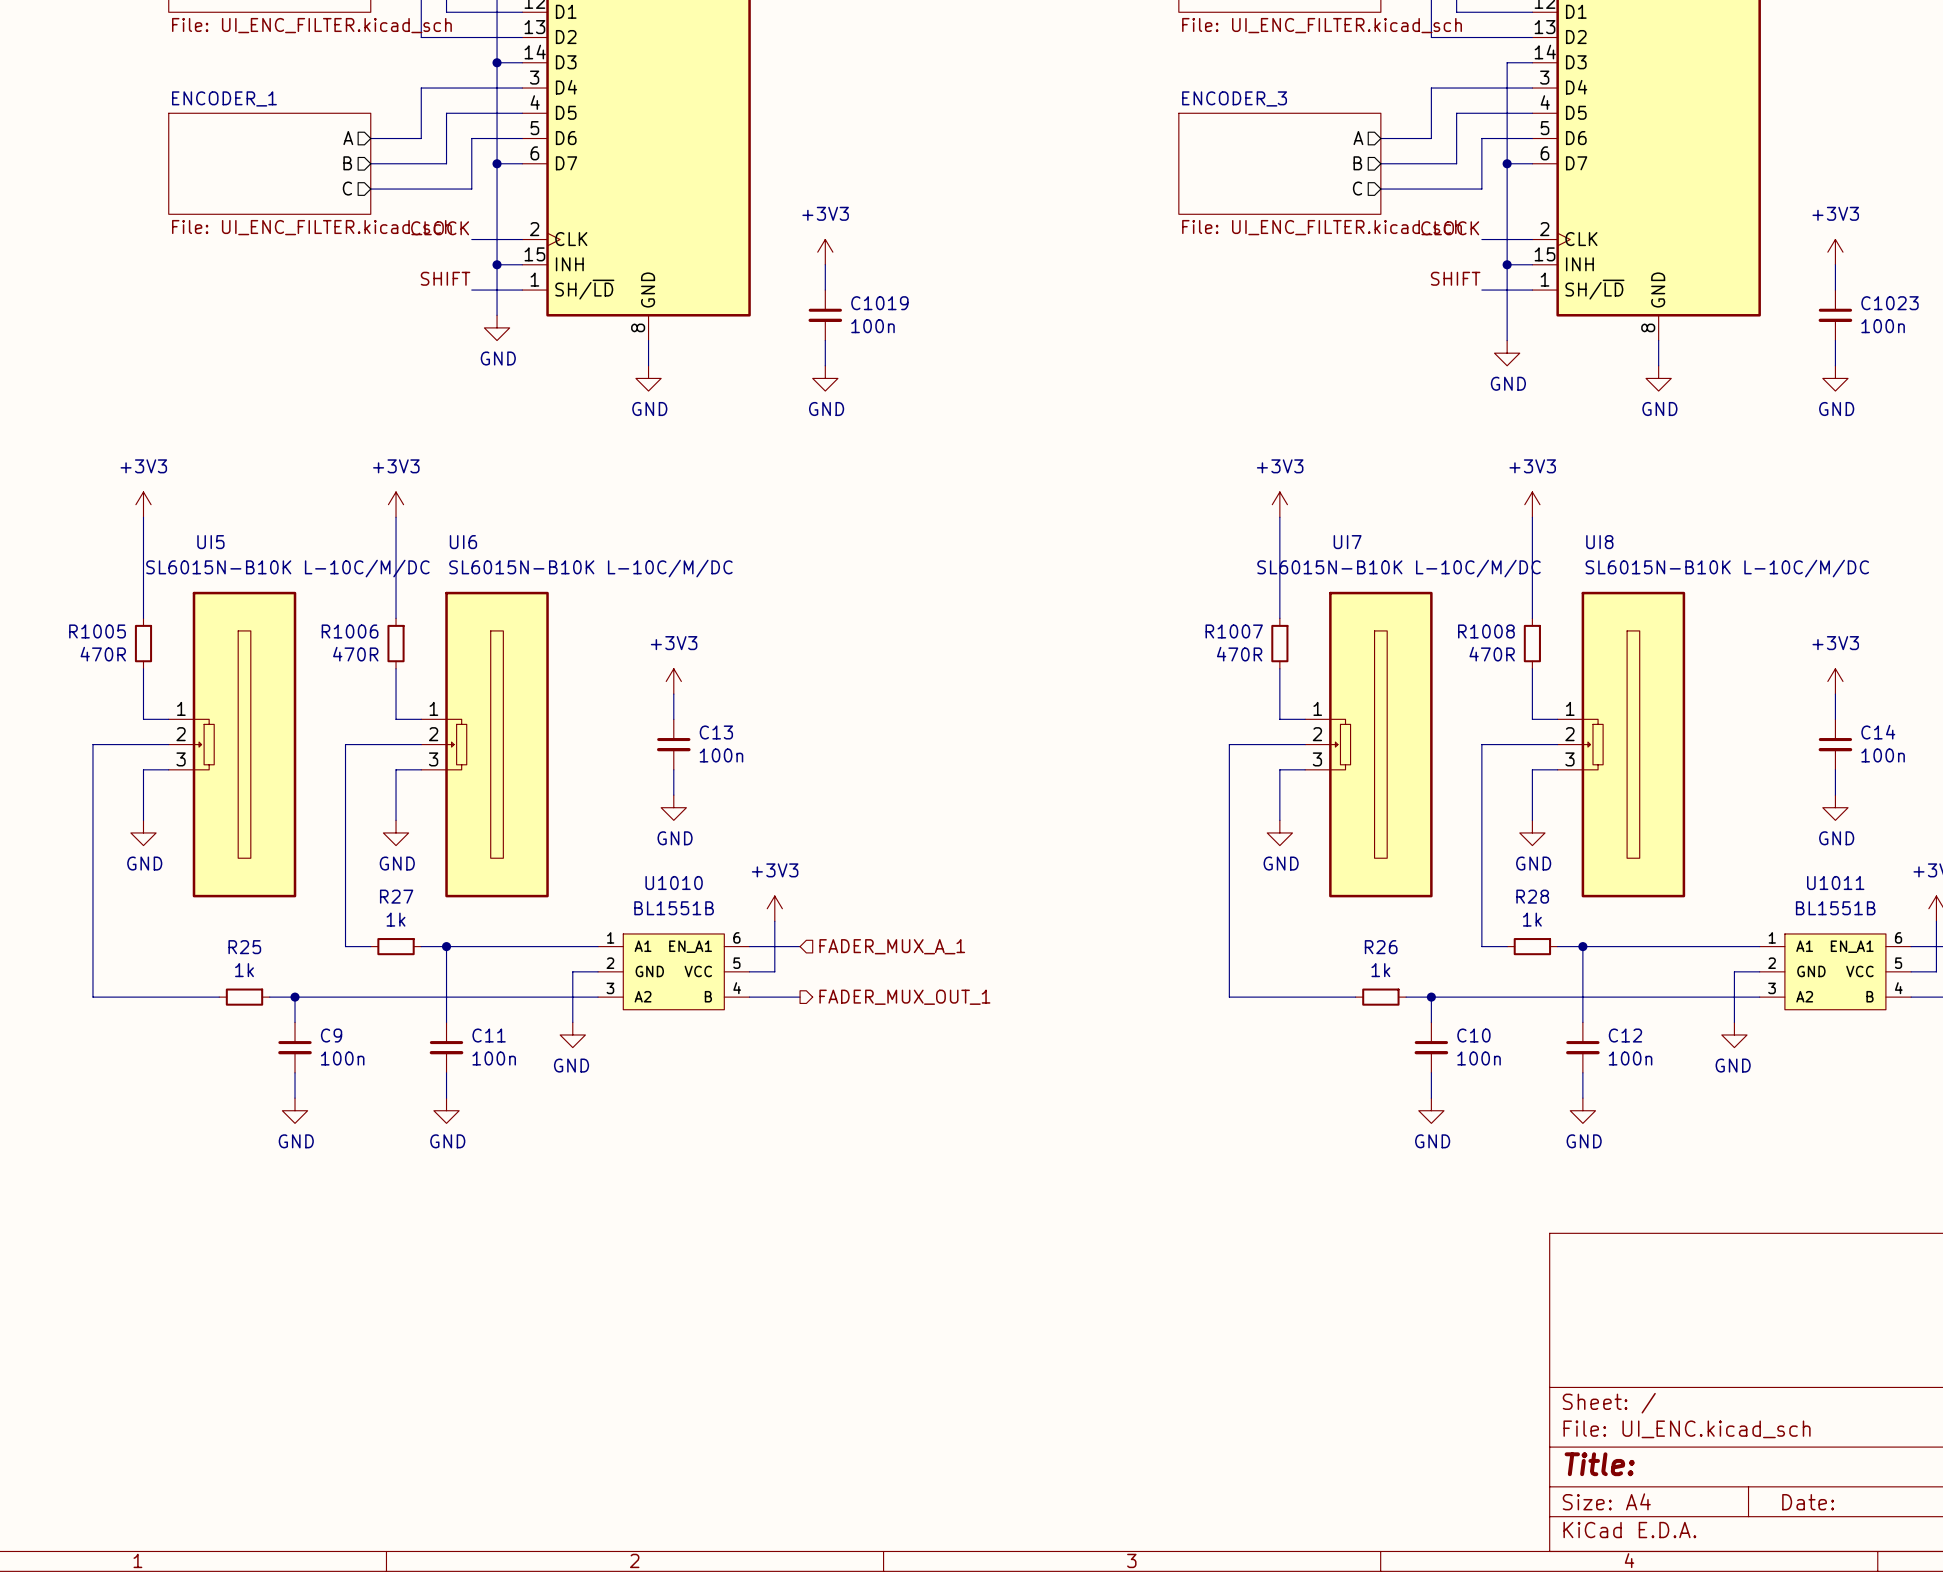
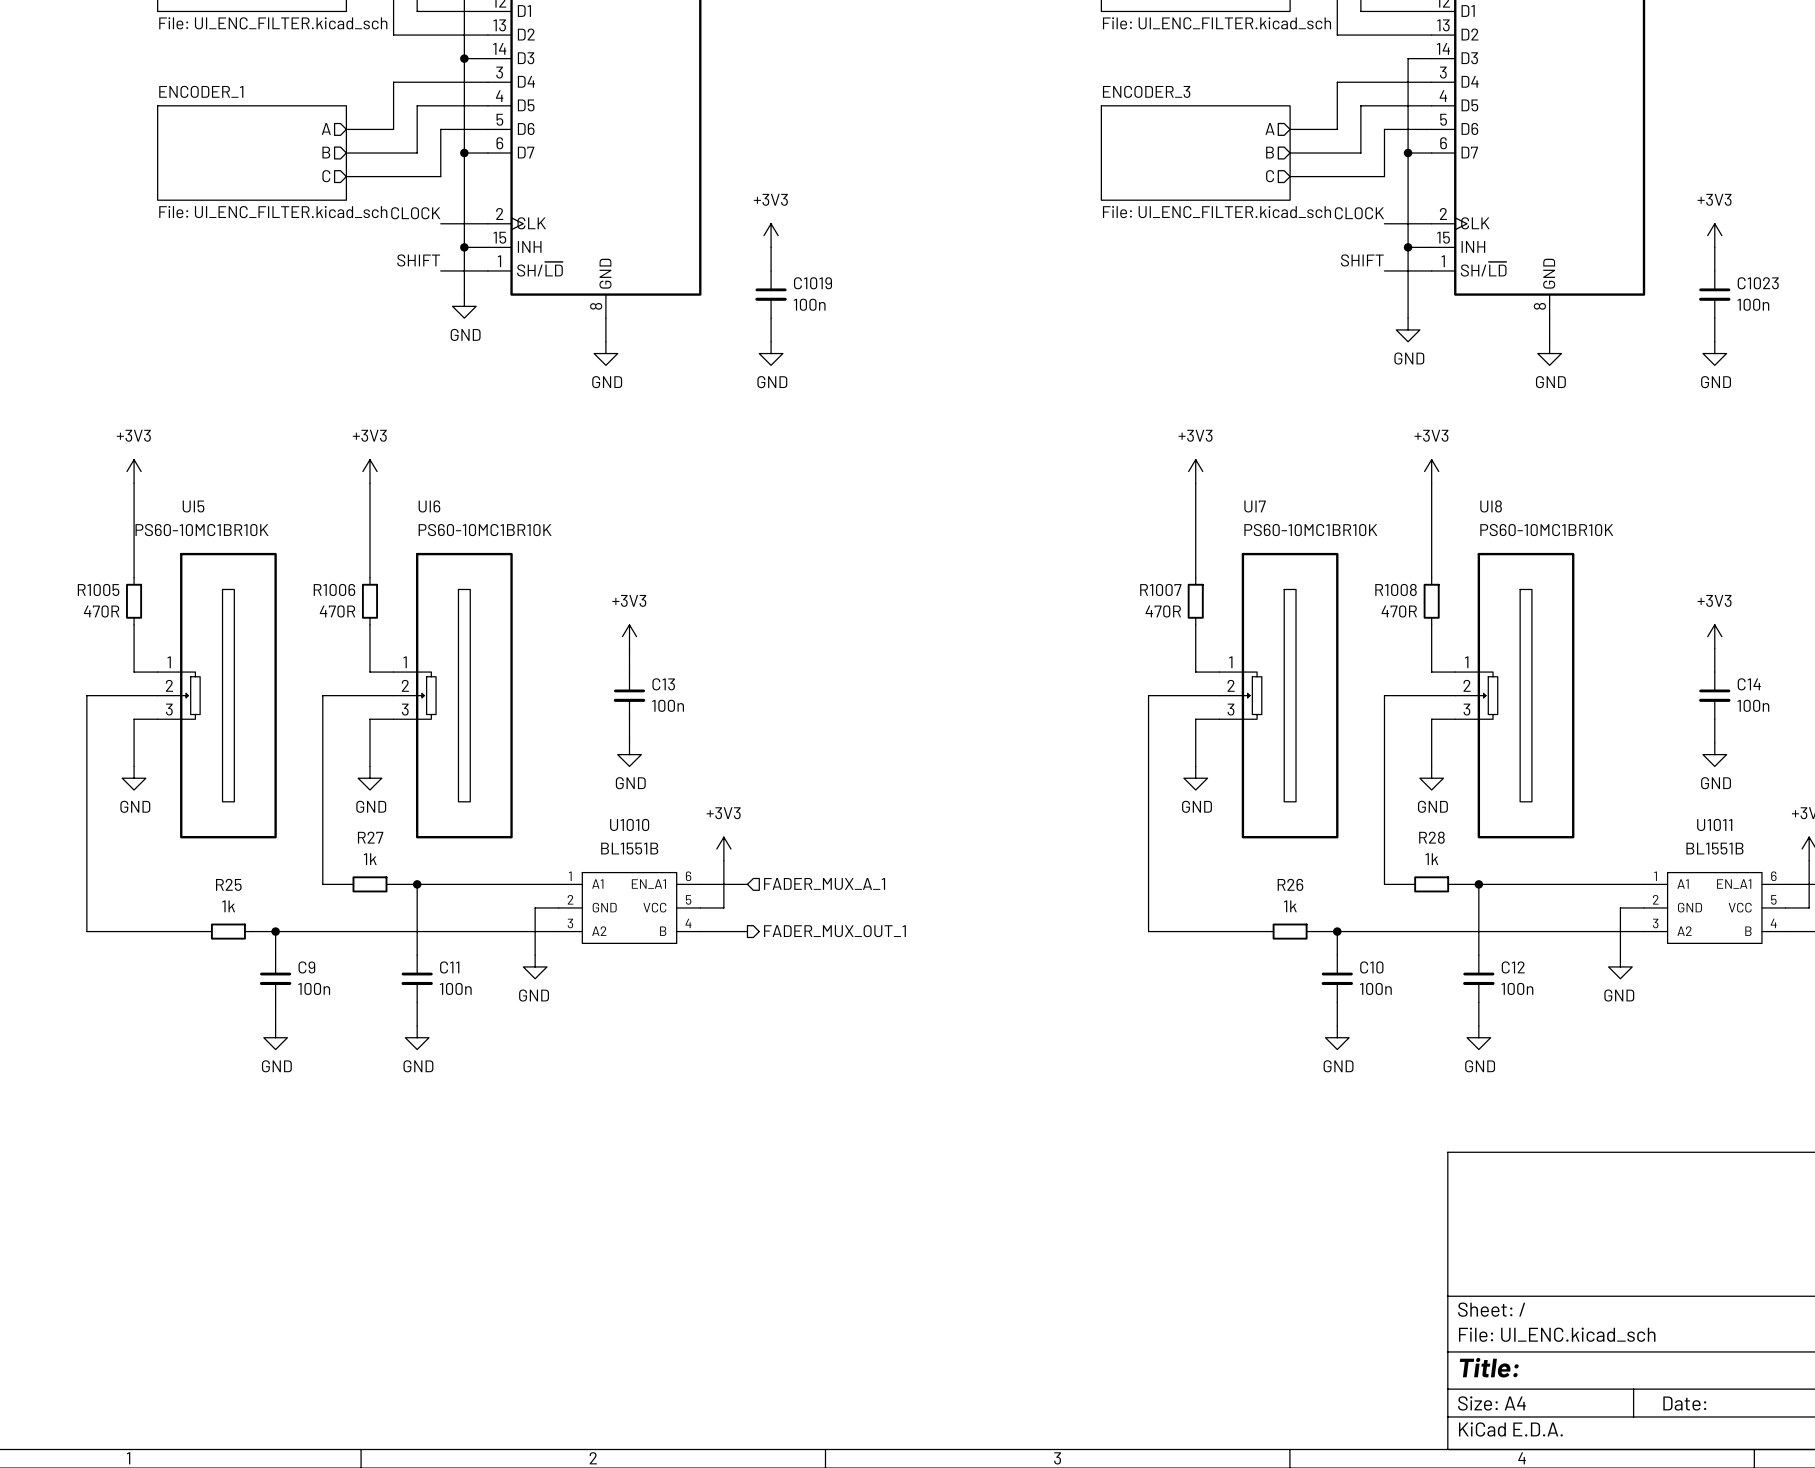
UI5 value: SL6015N-B10K L-10C/M/DC (287, 568) -> PS60-10MC1BR10K (201, 530)
UI6 value: SL6015N-B10K L-10C/M/DC (590, 568) -> PS60-10MC1BR10K (485, 530)
UI7 value: SL6015N-B10K L-10C/M/DC (1399, 568) -> PS60-10MC1BR10K (1310, 530)
UI8 value: SL6015N-B10K L-10C/M/DC (1727, 568) -> PS60-10MC1BR10K (1546, 530)

